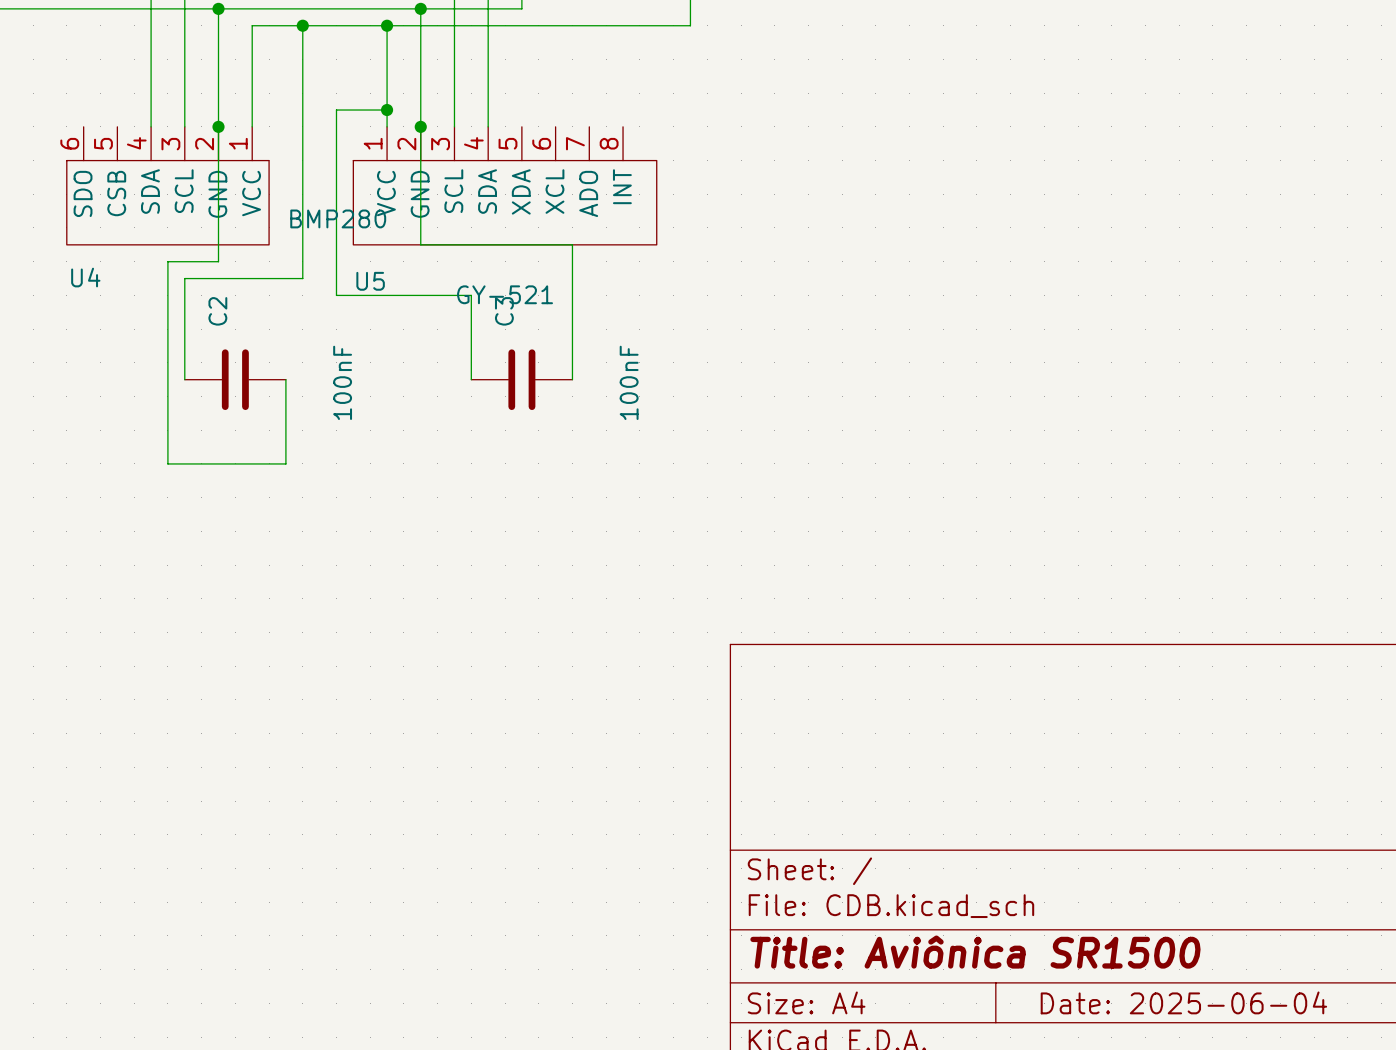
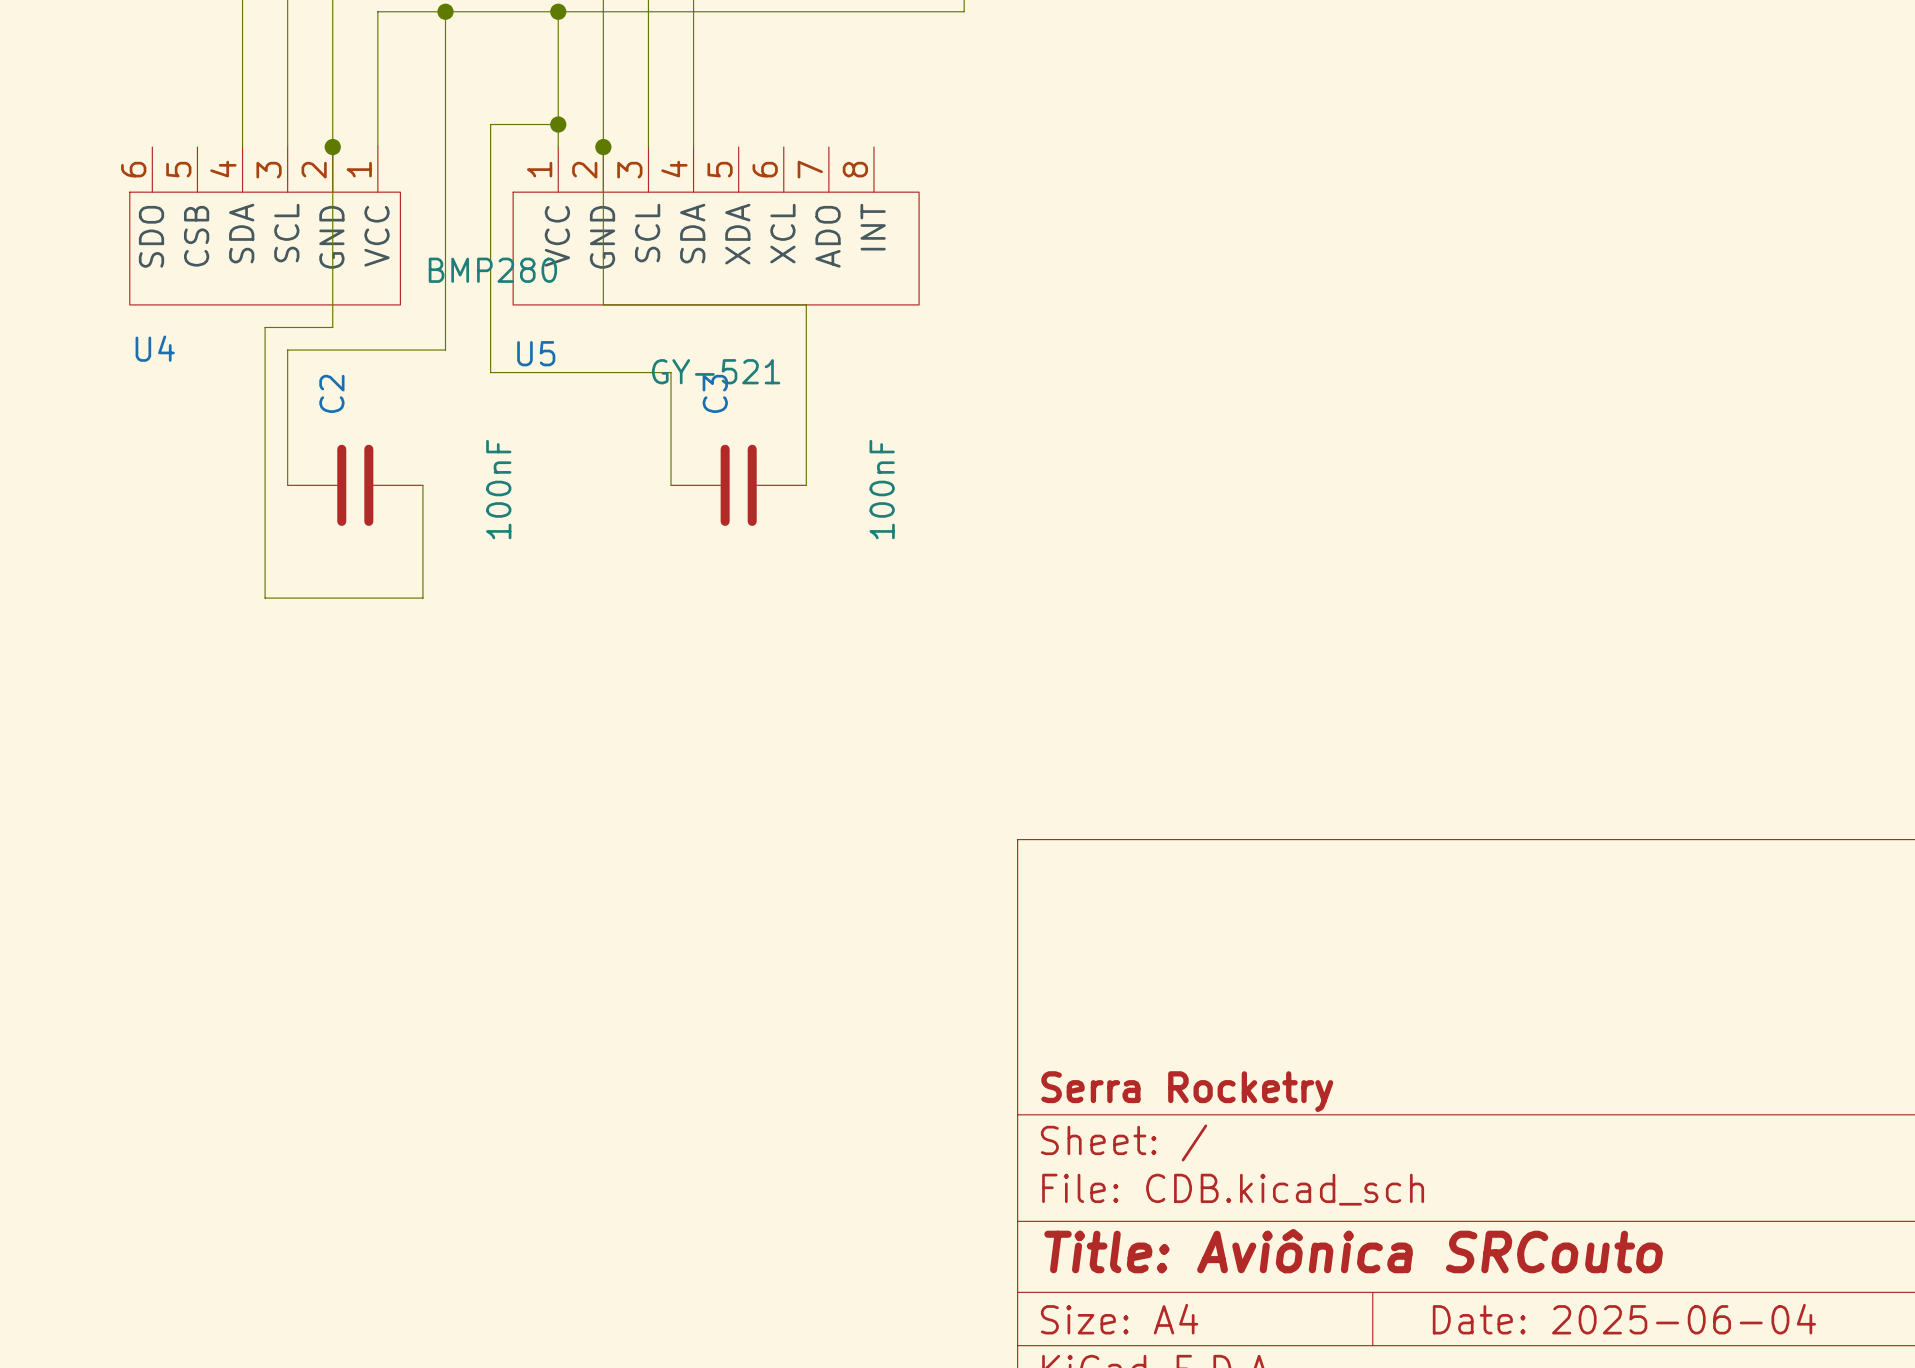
title block: none -> Serra Rocketry (1187, 1091)
title block: Title: Aviônica SR1500 (975, 952) -> Title: Aviônica SRCouto (1353, 1251)

